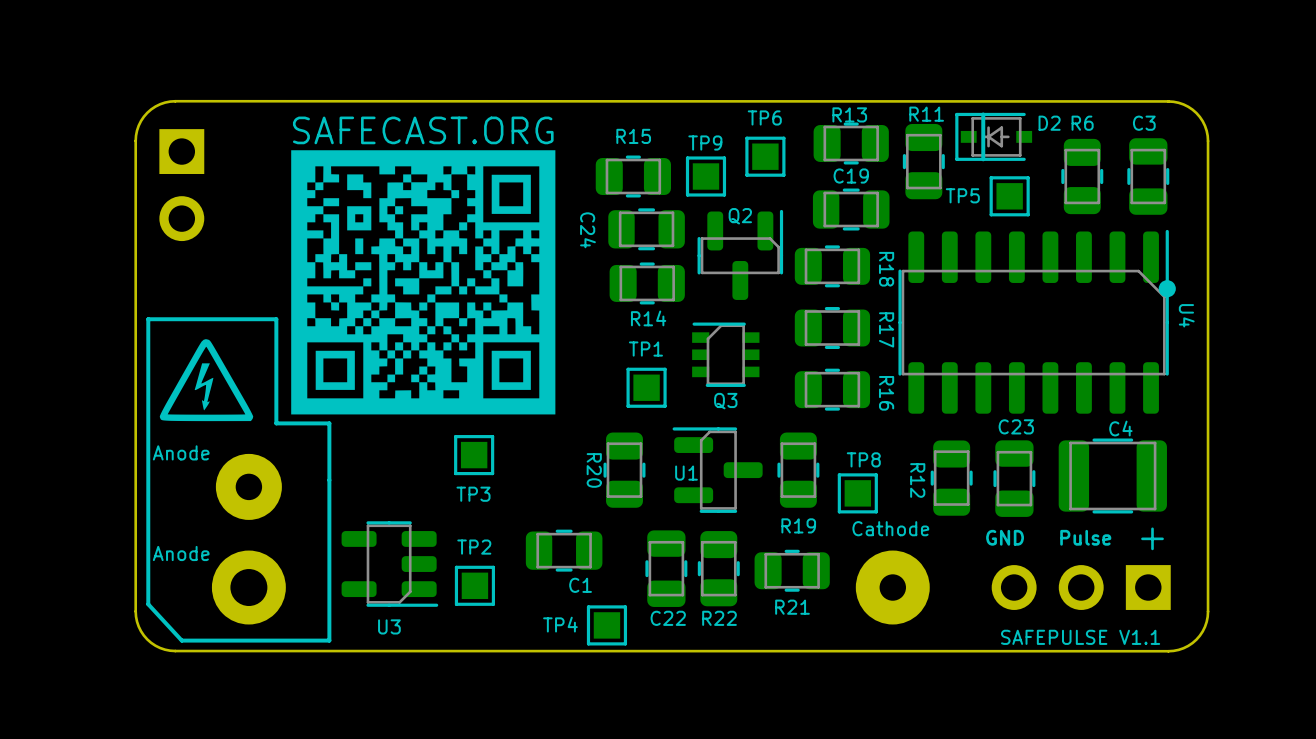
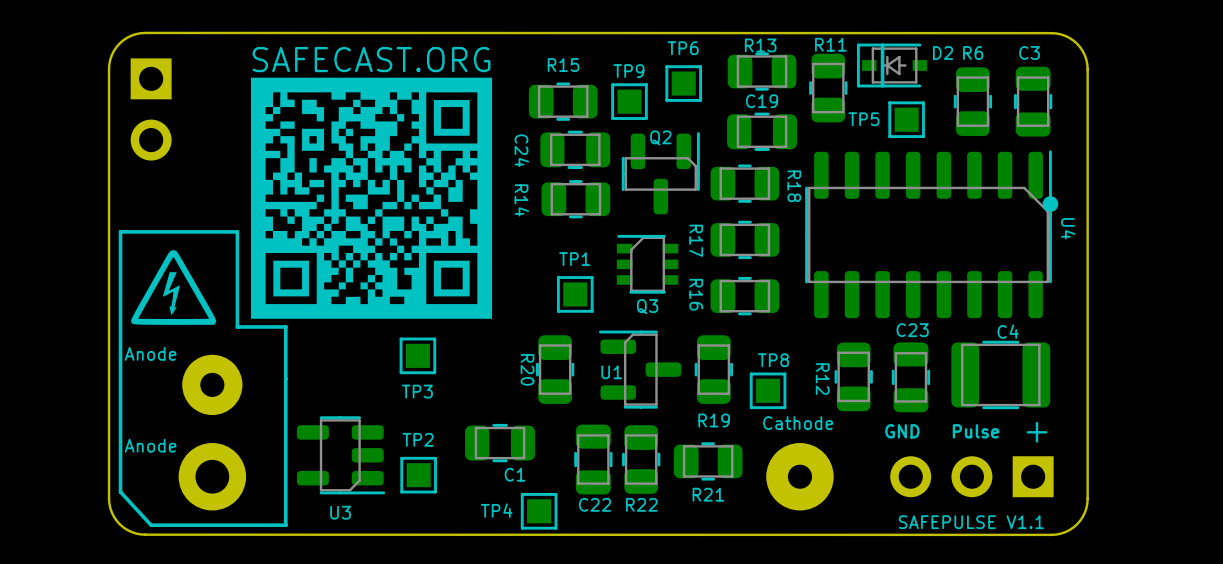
R14 name rotation: 0° (648, 318) -> 90° clockwise (521, 200)
R14 name position: R14 (648, 318) -> R14 (521, 200)
R17 name position: R17 (886, 329) -> R17 (696, 240)
R16 name position: R16 (886, 393) -> R16 (696, 294)

